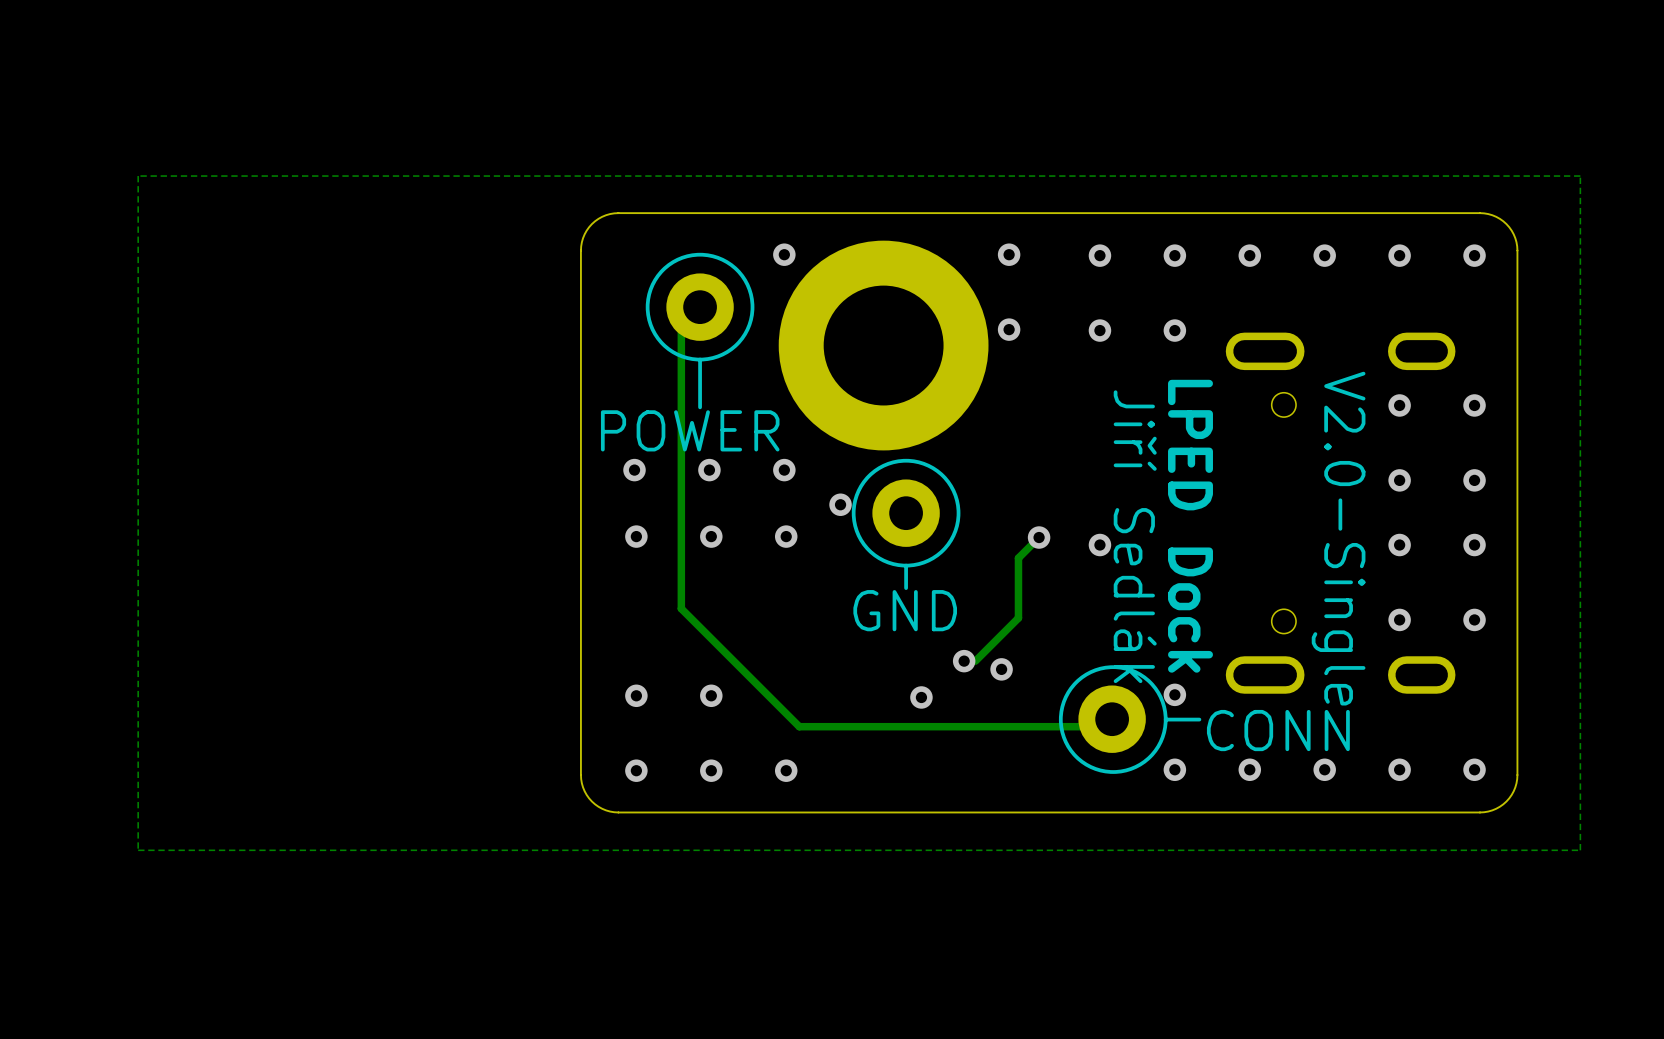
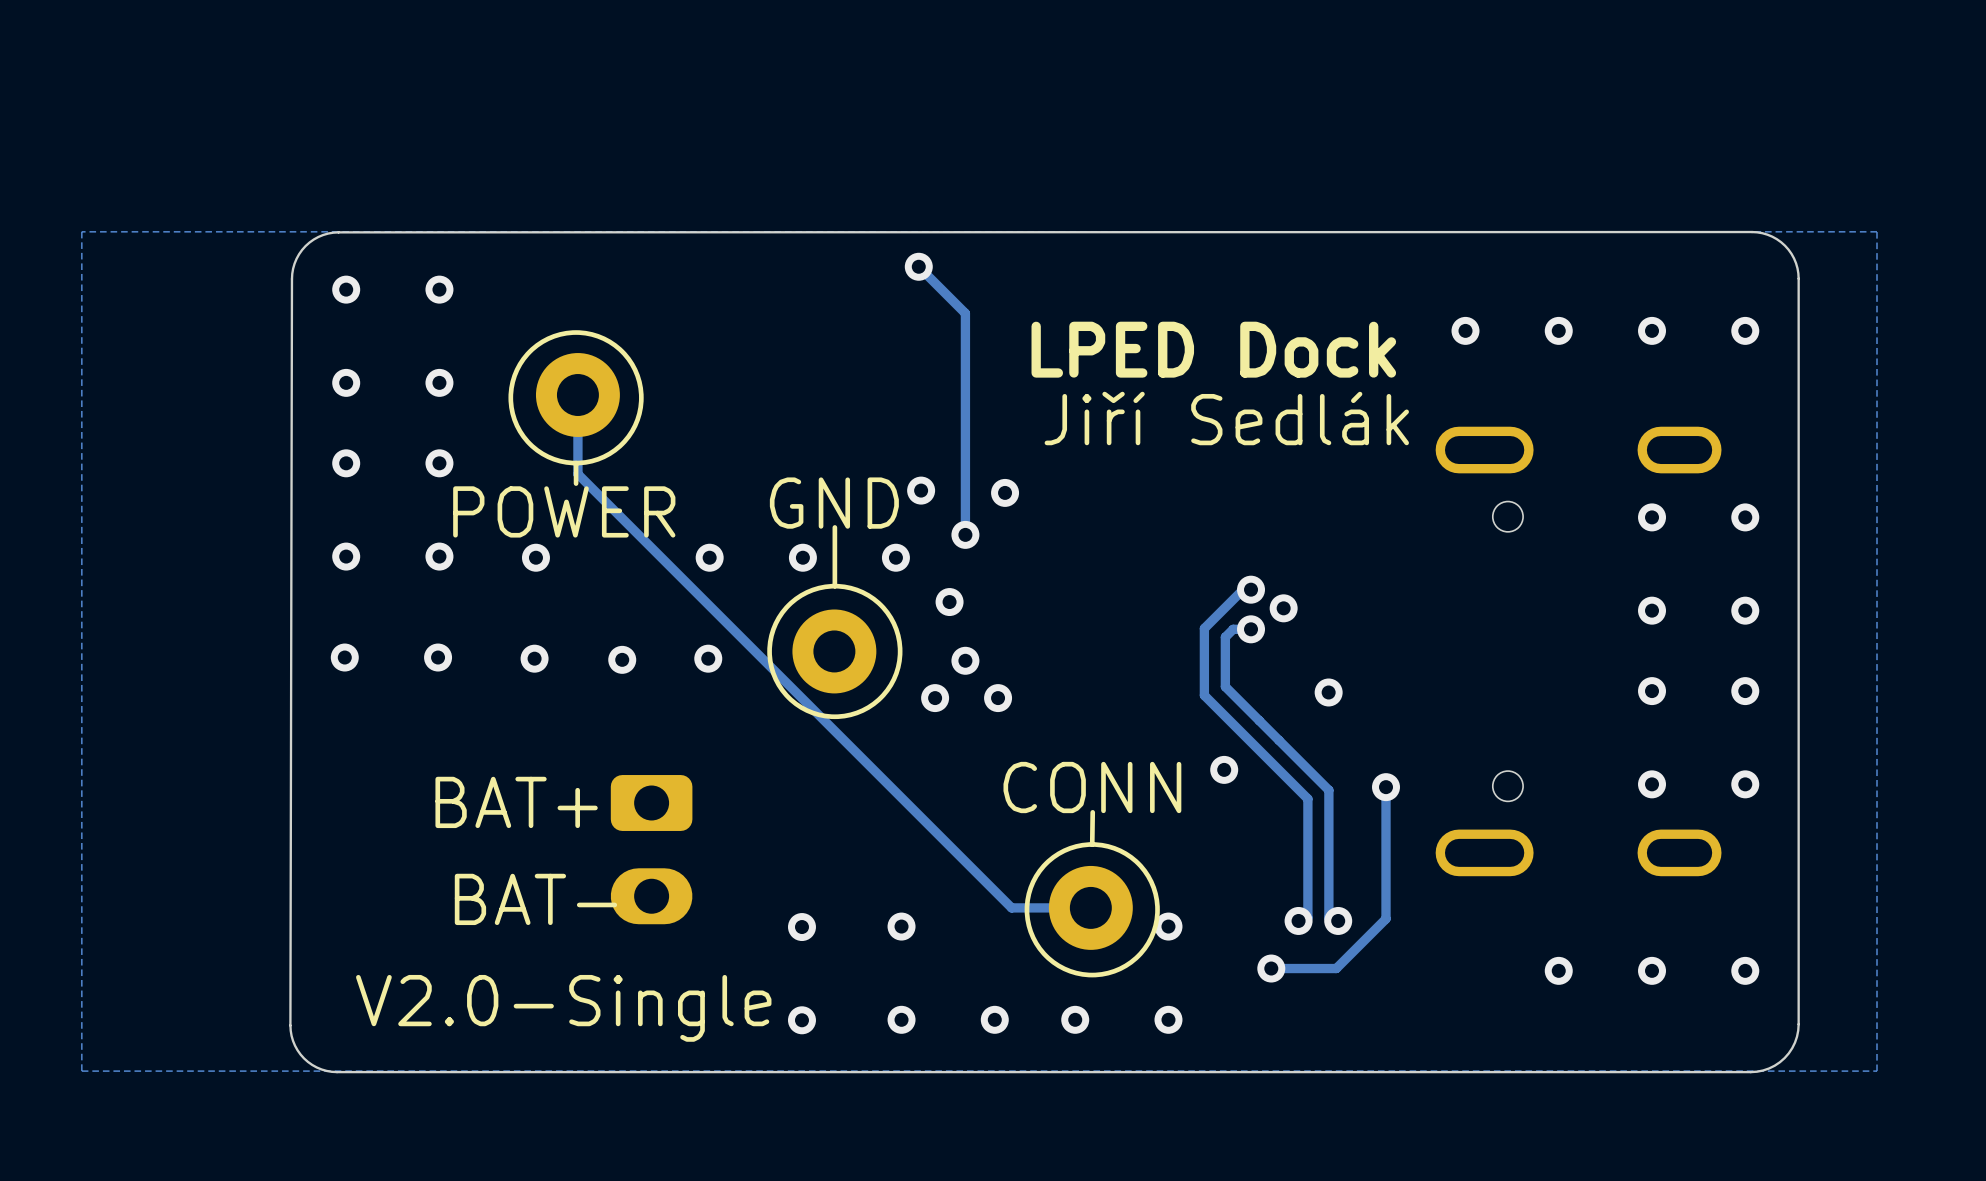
track: none -> (918, 266) (965, 313) (965, 534)
via: none -> (346, 289)
via: none -> (439, 289)
board edge: (1517, 250) (1513, 234) (1506, 224) (1492, 215) (1479, 213) (618, 213) (602, 216) (591, 224) (583, 238) (580, 250) (580, 775) (586, 794) (598, 806) (618, 812) (1479, 812) (1496, 808) (1506, 801) (1513, 791) (1517, 775) -> (1798, 324) (1798, 273) (1794, 258) (1788, 249) (1776, 239) (1757, 232) (338, 232) (318, 236) (309, 242) (299, 254) (293, 268) (291, 279) (290, 1025) (295, 1045) (304, 1058) (321, 1069) (337, 1072) (1750, 1072) (1763, 1070) (1774, 1065) (1784, 1058) (1792, 1048) (1798, 1030) (1798, 977)
drawing: [645, 252, 755, 362] -> none
via position: (784, 254) -> (918, 266)
via: (1009, 254) -> none
drawing: none -> [508, 330, 644, 466]
via: (1099, 255) -> none
via: (1174, 255) -> none
track: (681, 288) (681, 608) (799, 726) (1130, 726) -> none
via: none -> (346, 382)
via: none -> (439, 382)
track: none -> (577, 395) (577, 474) (1011, 907) (1090, 907)
part: none -> (577, 395)
part: (700, 307) -> none
via: (1009, 329) -> none
via: (1099, 330) -> none
via: (1174, 330) -> none
part: (883, 345) -> none
line: (700, 359) (700, 407) -> (834, 527) (834, 586)
line: none -> (576, 463) (576, 483)
via: none -> (346, 463)
via: none -> (439, 463)
via: none -> (921, 490)
via: none -> (1005, 492)
via: none -> (965, 534)
text position: POWER (690, 430) -> POWER (564, 511)
via: none -> (346, 556)
via: none -> (439, 556)
via: none -> (535, 557)
via: none -> (709, 557)
via: none -> (895, 557)
drawing: none -> [767, 583, 903, 720]
drawing: [851, 458, 961, 568] -> none
track: none -> (1251, 589) (1243, 589) (1204, 628) (1204, 695) (1307, 798) (1307, 917) (1298, 927)
via: none -> (1251, 589)
via: (634, 470) -> none
via position: (709, 470) -> (802, 557)
via: (784, 470) -> none
via: none -> (949, 602)
via: none -> (1283, 608)
track: none -> (1251, 629) (1233, 629) (1225, 637) (1225, 686) (1328, 790) (1328, 917) (1338, 927)
via: none -> (1251, 629)
via position: (840, 504) -> (965, 660)
part: none -> (834, 651)
part: (906, 513) -> none
via: none -> (344, 657)
via: none -> (438, 657)
via: none -> (534, 658)
via: none -> (622, 659)
text rotation: 0° (1190, 526) -> 90° counterclockwise (1213, 349)
via position: (636, 536) -> (708, 658)
via: (711, 536) -> none
via: (786, 536) -> none
text rotation: 0° (1135, 536) -> 90° counterclockwise (1226, 418)
track: (1039, 537) (1018, 558) (1018, 618) (975, 661) -> none
via: (1039, 537) -> none
text: V2.0-Single (1338, 538) -> none
via: (1099, 545) -> none
via: none -> (1328, 692)
via: none -> (935, 698)
via: none -> (998, 698)
line: (906, 565) (906, 588) -> none
via: none -> (1224, 769)
text position: GND (905, 610) -> GND (834, 503)
track: none -> (1386, 787) (1386, 918) (1336, 968) (1271, 968)
via: none -> (1386, 787)
text: none -> BAT+ (516, 802)
line: none -> (1092, 812) (1092, 844)
via: (964, 661) -> none
drawing: [1058, 665, 1168, 774] -> none
drawing: none -> [1024, 842, 1160, 978]
via: (1001, 669) -> none
part: none -> (651, 849)
via: (1174, 694) -> none
via: (636, 695) -> none
via: (711, 695) -> none
via: (921, 697) -> none
text: none -> BAT- (535, 899)
part: none -> (1090, 907)
part: (1112, 719) -> none
line: (1199, 719) (1165, 719) -> none
via: none -> (1298, 920)
via: none -> (1338, 920)
text position: CONN (1278, 730) -> CONN (1092, 787)
via: none -> (801, 927)
via: none -> (901, 926)
via: none -> (1168, 926)
via: none -> (1271, 968)
via: (1174, 769) -> none
via: (1249, 769) -> none
via: (636, 770) -> none
via: (711, 770) -> none
via: (786, 770) -> none
text: none -> V2.0-Single (563, 1008)
via: none -> (801, 1020)
via: none -> (901, 1019)
via: none -> (994, 1019)
via: none -> (1075, 1019)
via: none -> (1168, 1019)

